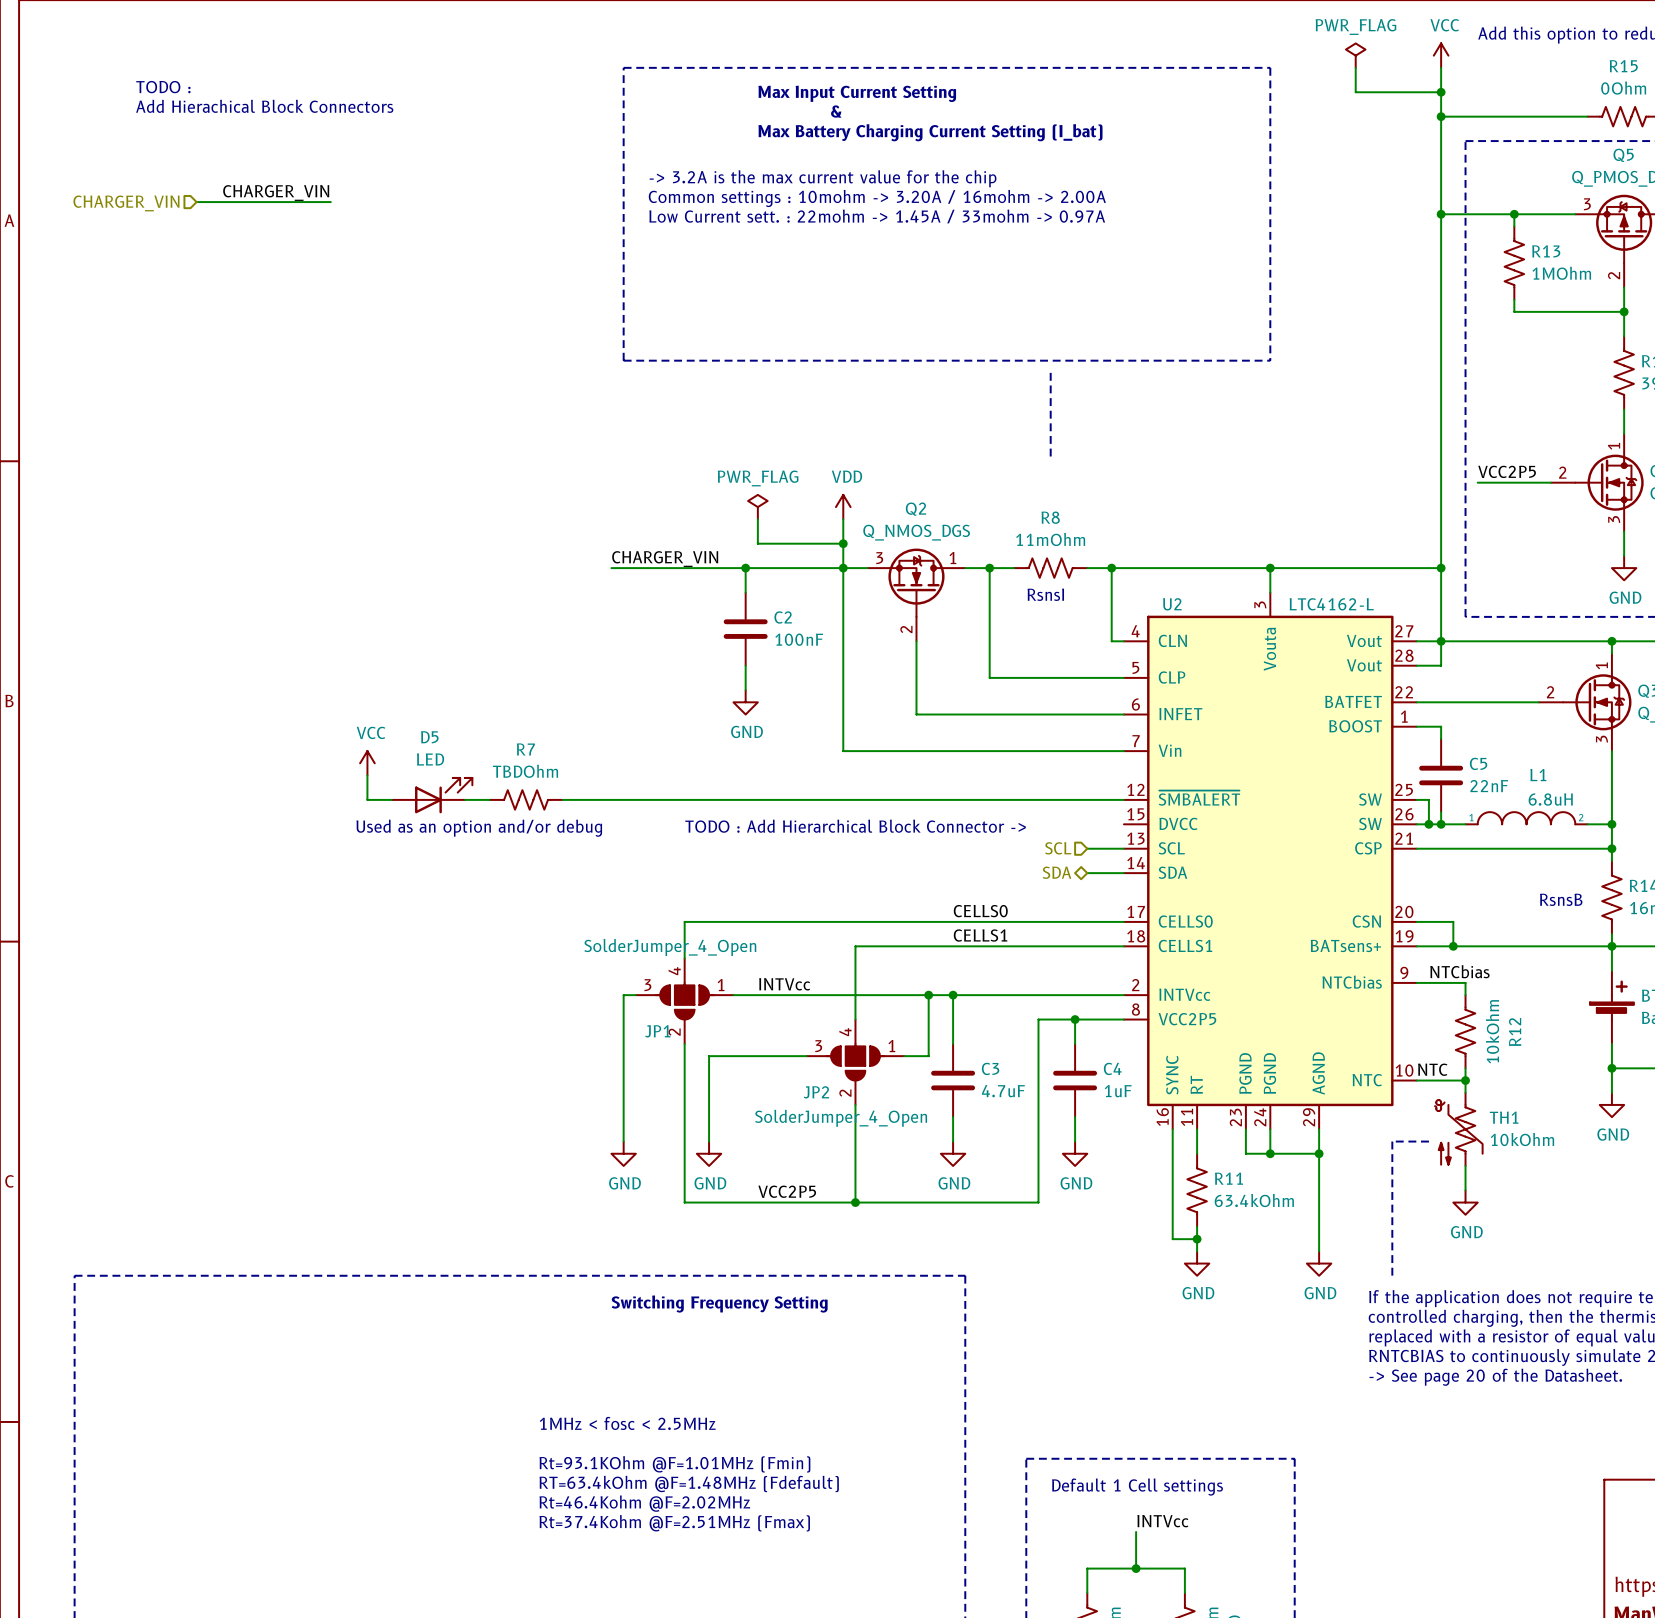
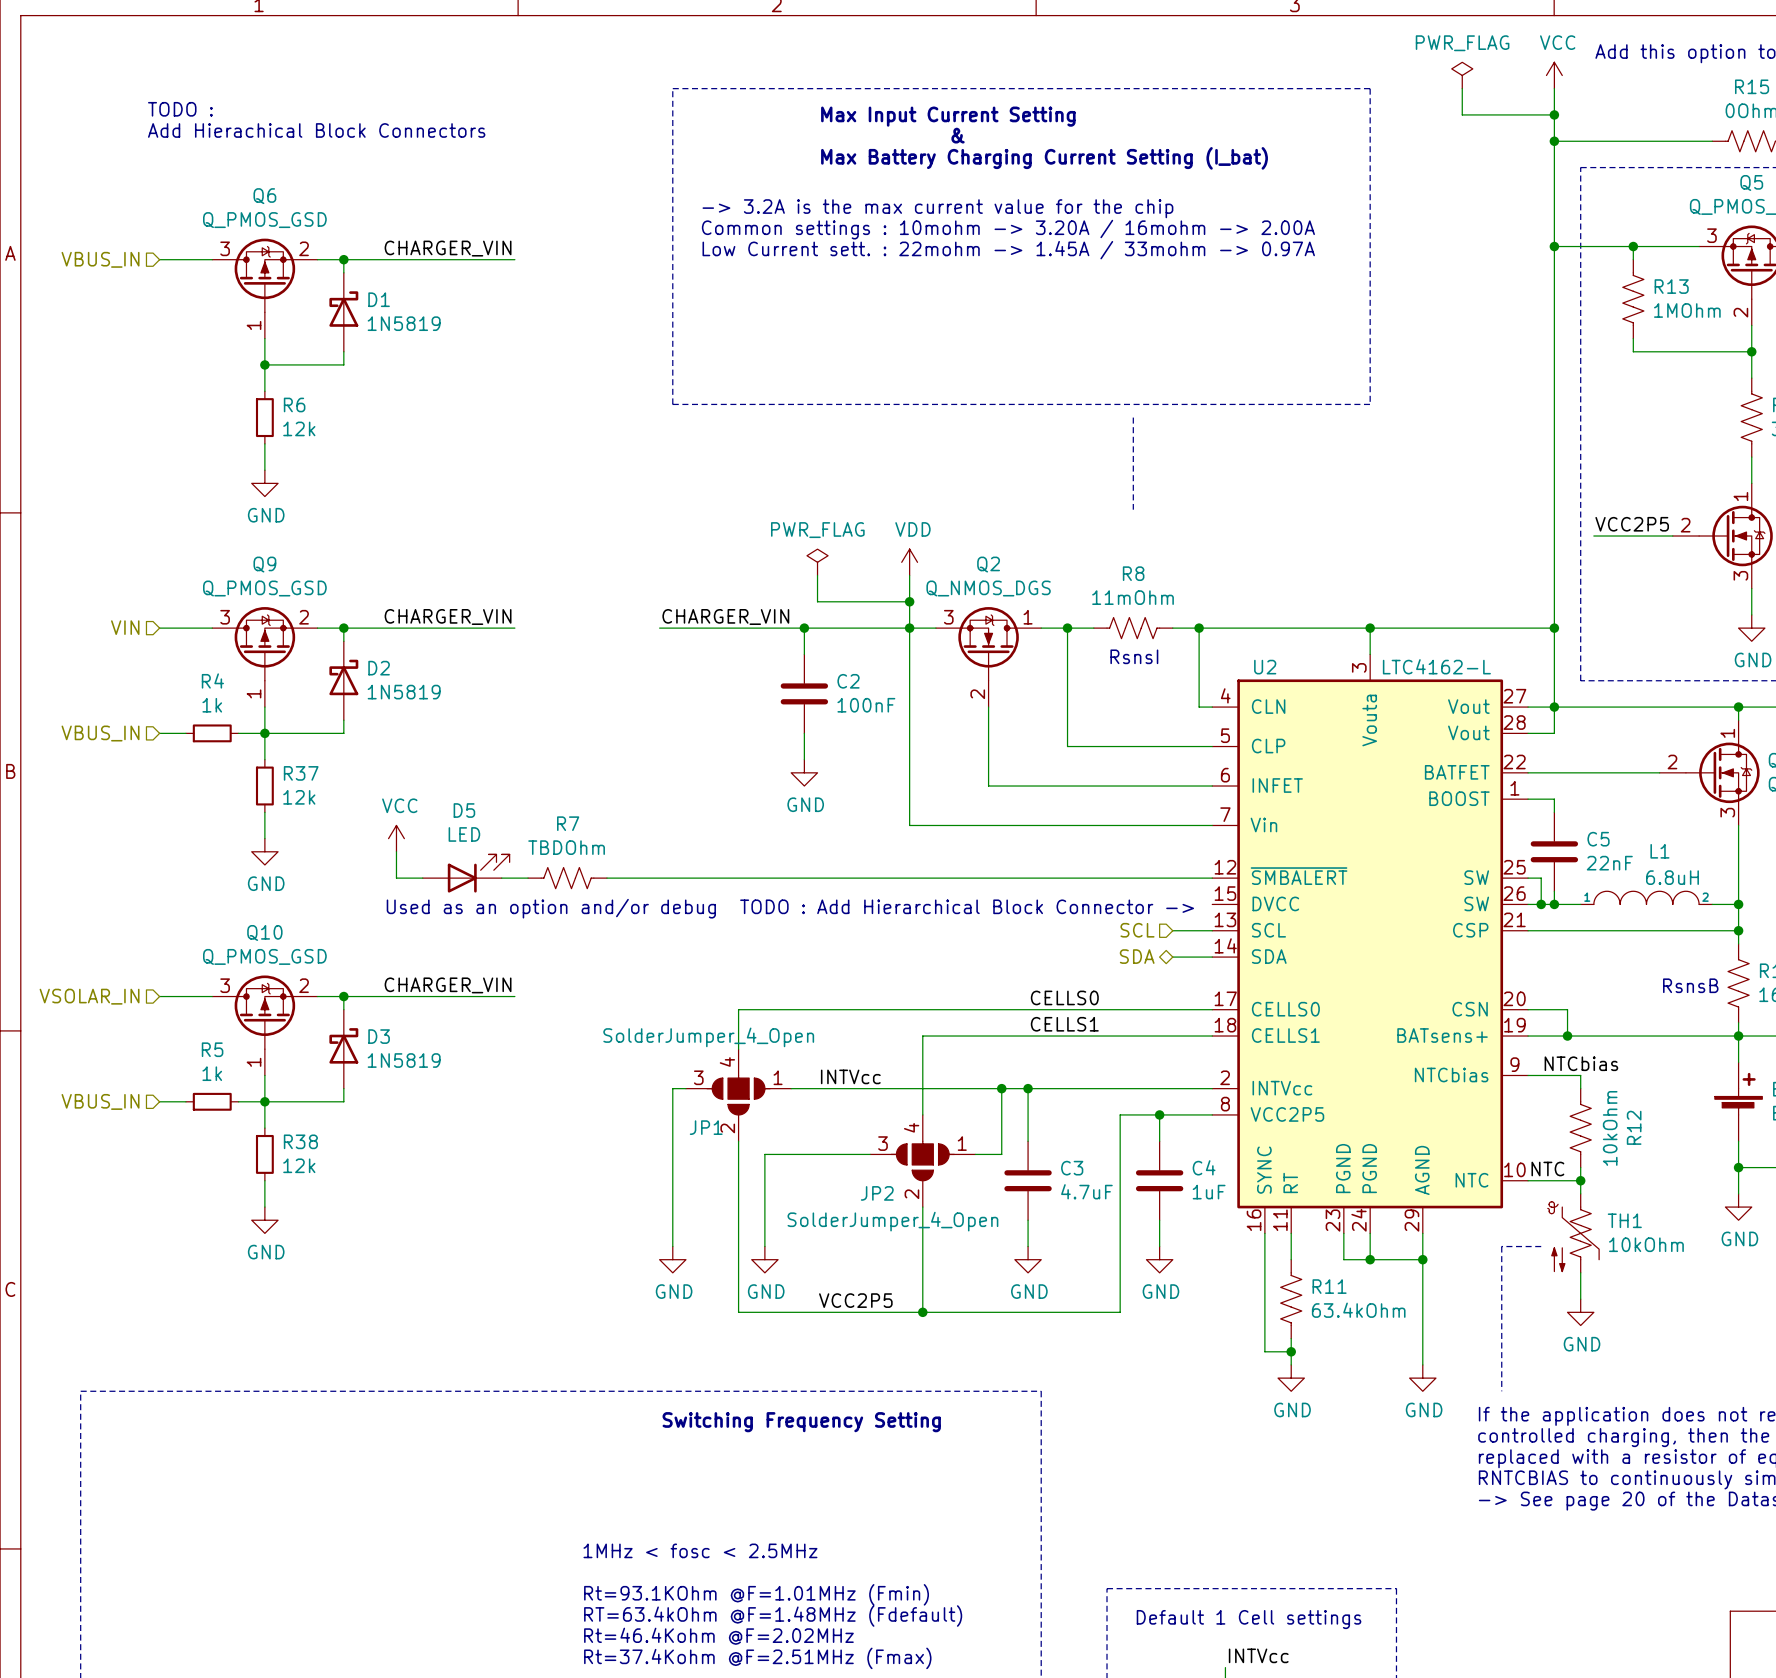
label position: CHARGER_VIN (276, 193) -> CHARGER_VIN (448, 248)
wire: (196, 202) (330, 202) -> none
hierarchical label: CHARGER_VIN (126, 203) -> none
wire: none -> (159, 259) (212, 259)
wire: none -> (317, 259) (514, 259)
wire: none -> (343, 259) (343, 272)
junction: none -> (343, 259)
hierarchical label: none -> VBUS_IN (100, 259)
Q6: none -> Q_PMOS_GSD (264, 288)
D1: none -> 1N5819 (343, 312)
wire: none -> (264, 338) (264, 391)
wire: none -> (343, 351) (343, 364) (264, 364)
junction: none -> (264, 364)
R6: none -> 12k (264, 417)
wire: none -> (264, 443) (264, 470)
power symbol: none -> GND (264, 483)
label: none -> CHARGER_VIN (448, 616)
hierarchical label: none -> VIN (125, 627)
wire: none -> (159, 628) (212, 628)
wire: none -> (317, 628) (514, 628)
wire: none -> (343, 628) (343, 641)
junction: none -> (343, 628)
Q9: none -> Q_PMOS_GSD (264, 657)
D2: none -> 1N5819 (343, 680)
wire: none -> (264, 707) (264, 759)
wire: none -> (343, 720) (343, 733) (238, 733)
wire: none -> (159, 733) (185, 733)
R4: none -> 1k (212, 733)
junction: none -> (264, 733)
hierarchical label: none -> VBUS_IN (100, 733)
R37: none -> 12k (264, 786)
wire: none -> (264, 812) (264, 838)
power symbol: none -> GND (264, 851)
label: none -> CHARGER_VIN (448, 985)
wire: none -> (159, 996) (212, 996)
wire: none -> (317, 996) (514, 996)
wire: none -> (343, 996) (343, 1009)
junction: none -> (343, 996)
hierarchical label: none -> VSOLAR_IN (89, 996)
Q10: none -> Q_PMOS_GSD (264, 1025)
D3: none -> 1N5819 (343, 1049)
wire: none -> (264, 1075) (264, 1128)
wire: none -> (343, 1088) (343, 1101) (238, 1101)
wire: none -> (159, 1101) (185, 1101)
R5: none -> 1k (212, 1101)
junction: none -> (264, 1101)
hierarchical label: none -> VBUS_IN (100, 1101)
R38: none -> 12k (264, 1154)
wire: none -> (264, 1180) (264, 1207)
power symbol: none -> GND (264, 1220)

